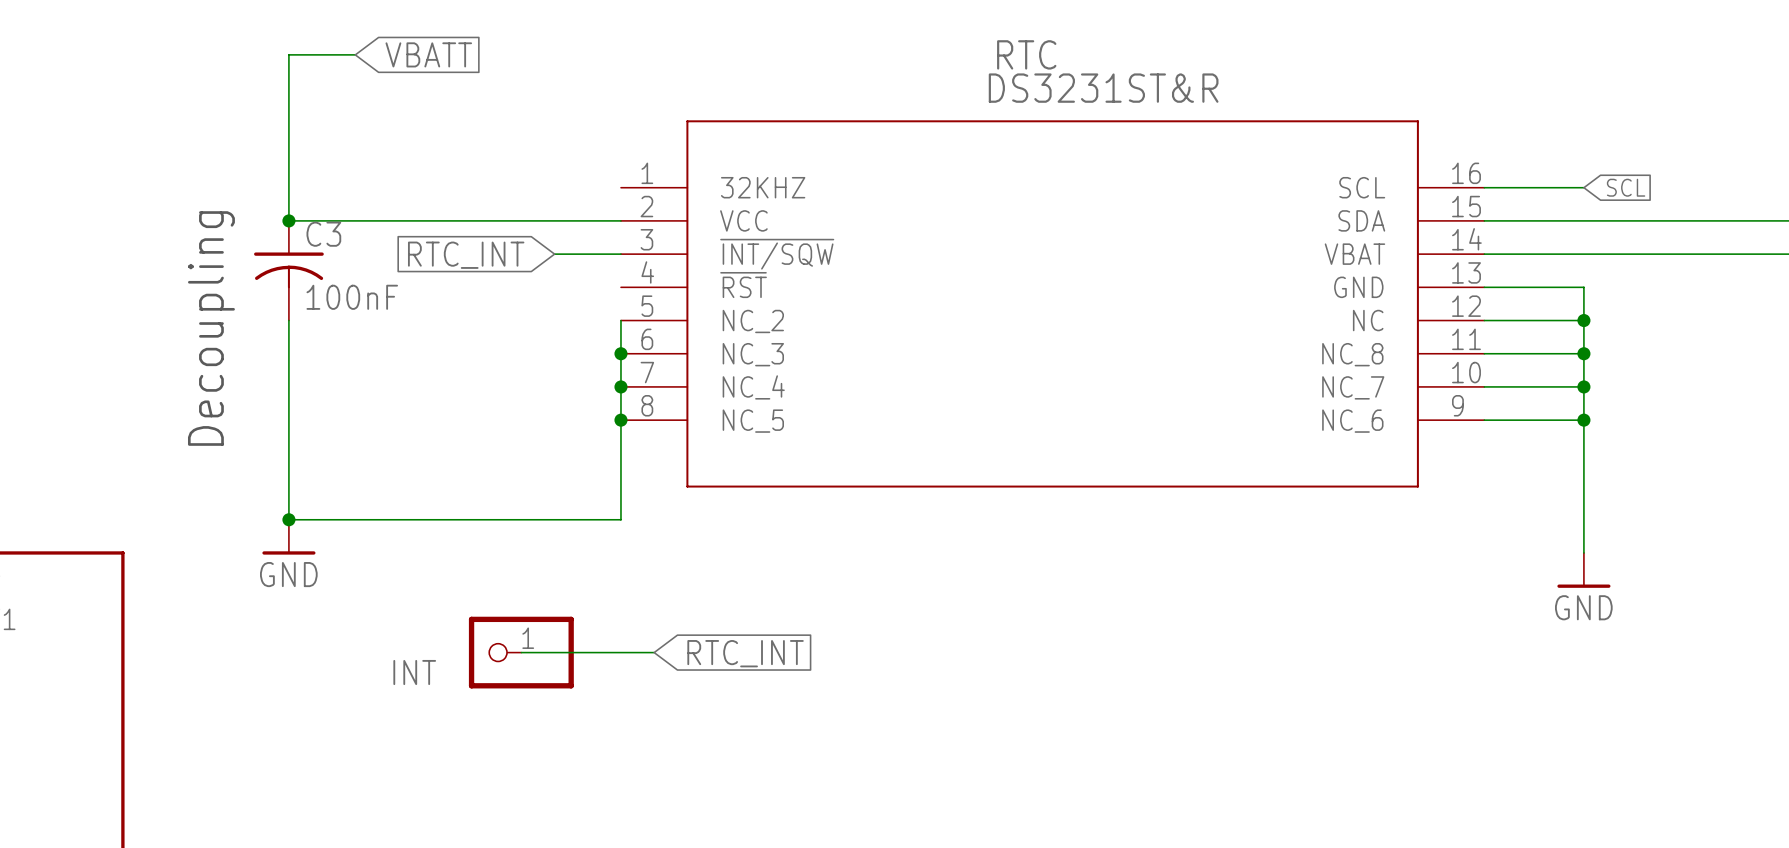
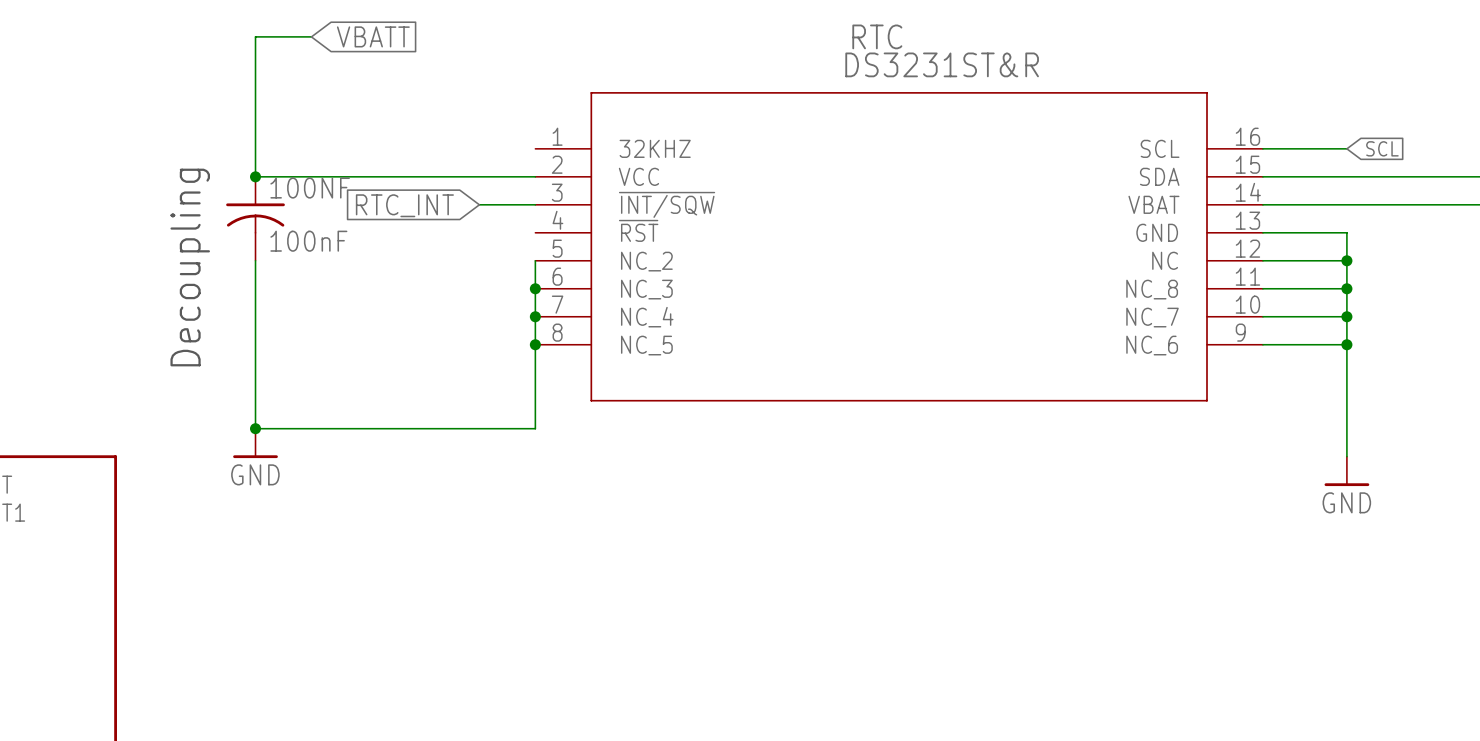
C3 name: C3 (323, 234) -> 100NF (310, 188)
wire: (521, 652) (654, 652) -> none
INT: (521, 652) -> none
global label: RTC_INT (745, 653) -> none

